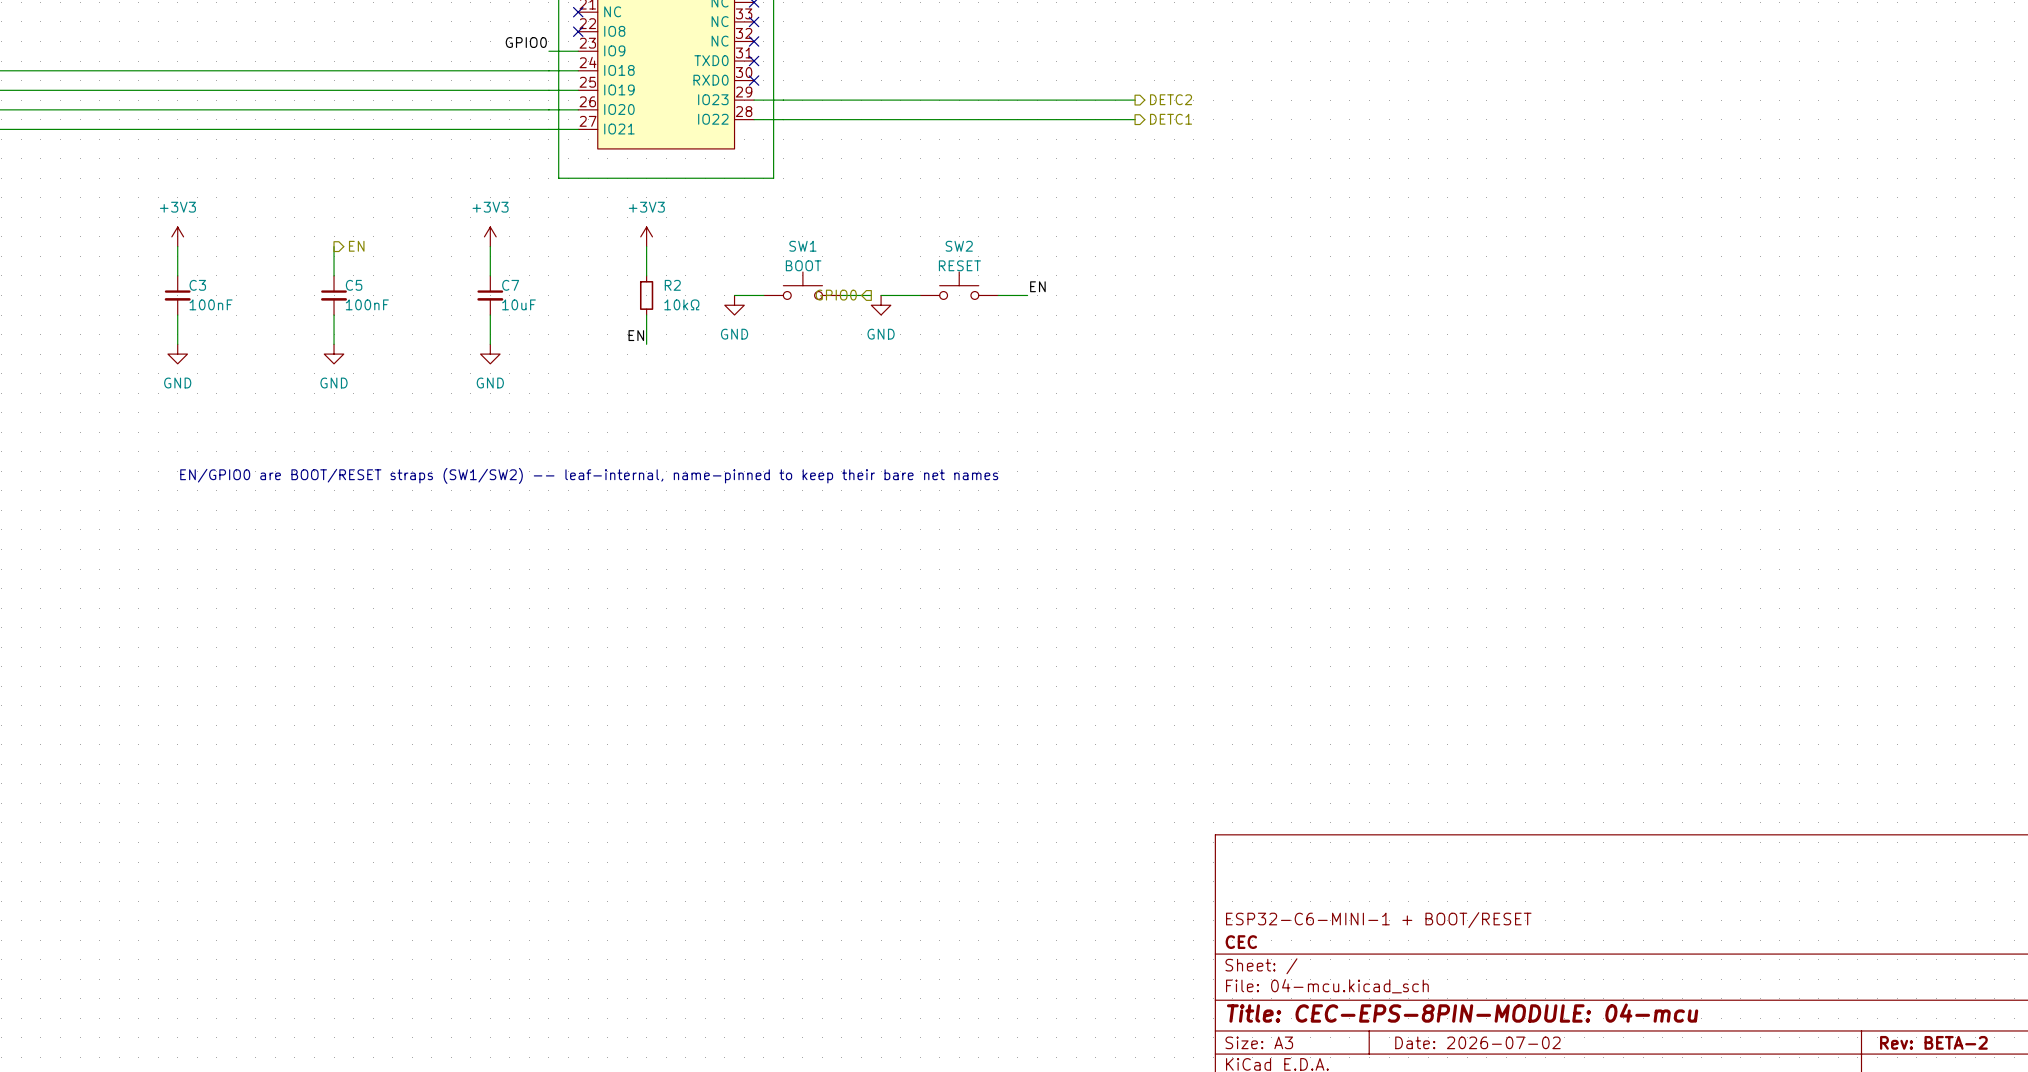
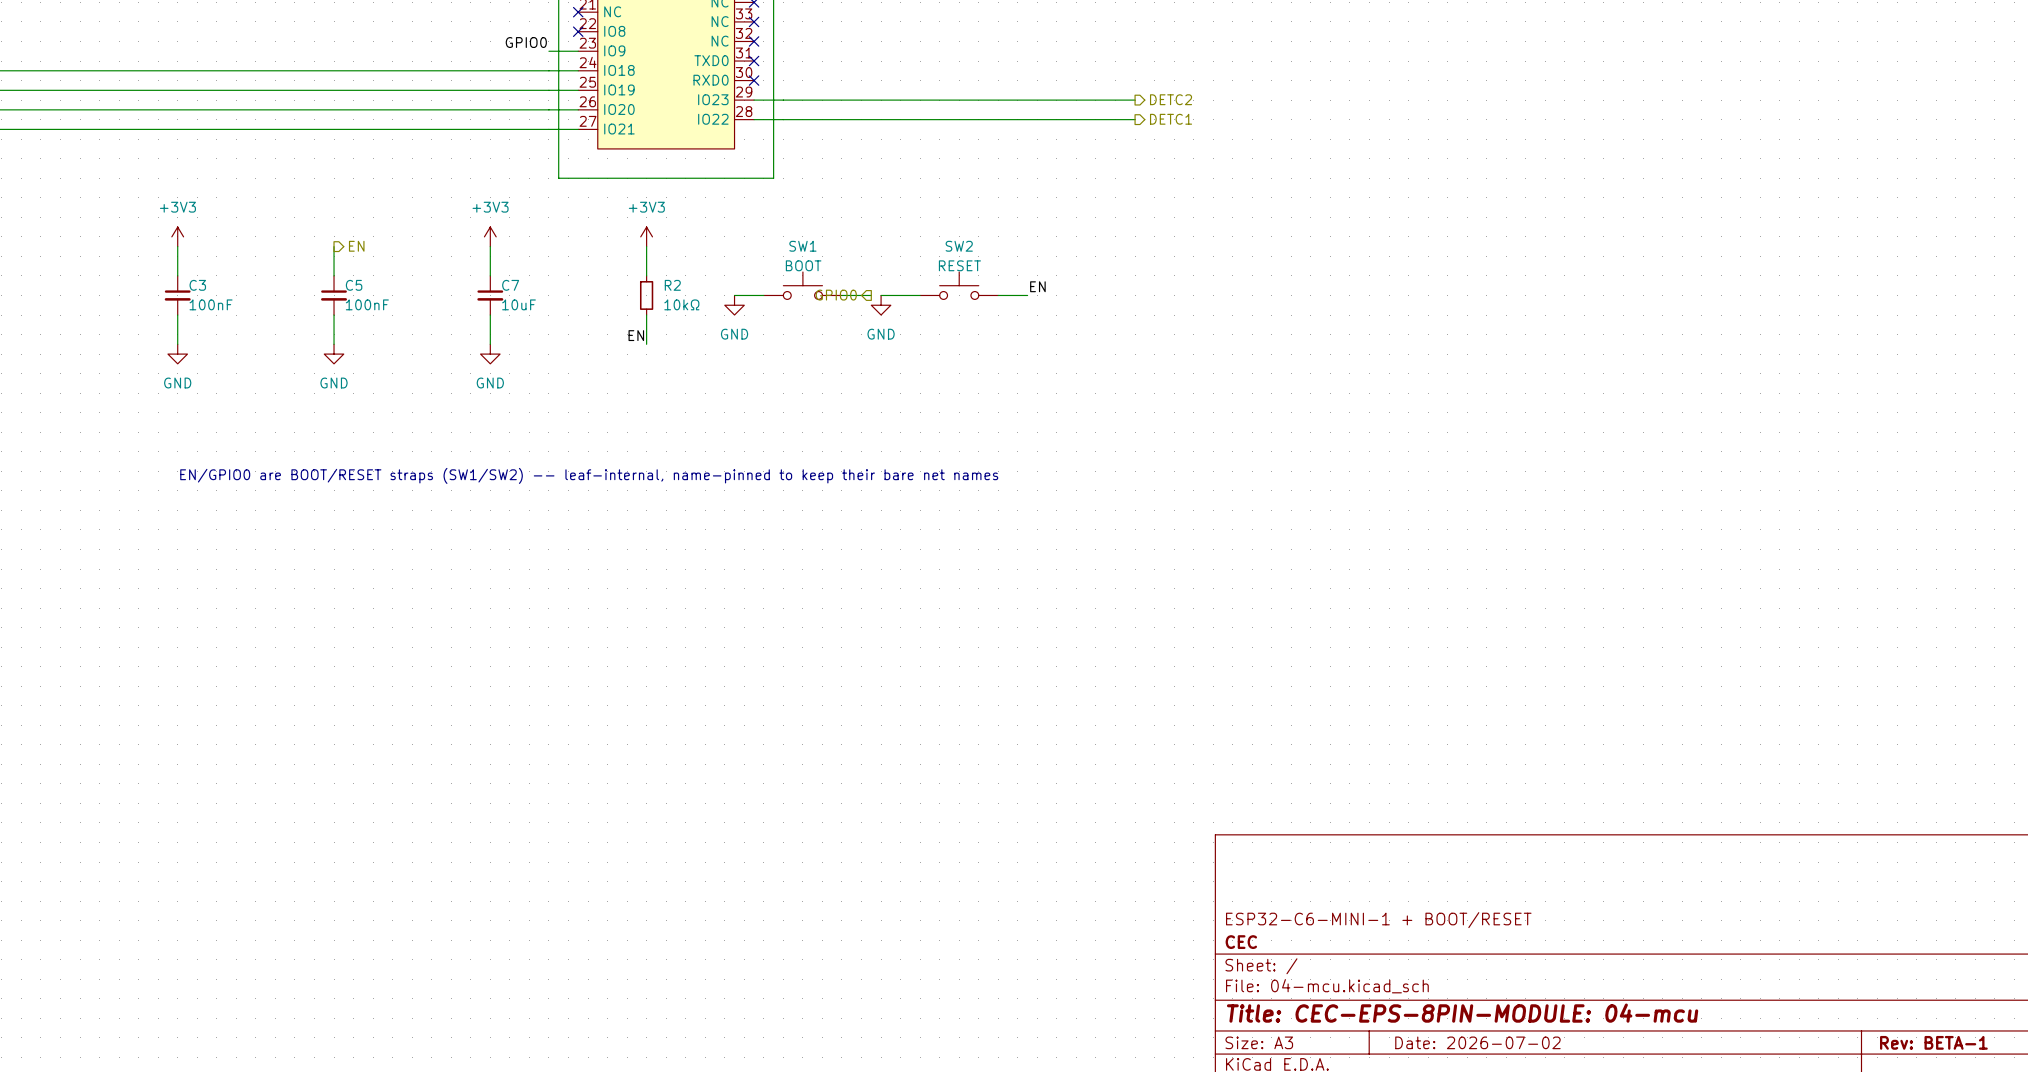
title block: Rev: BETA-2 (1933, 1042) -> Rev: BETA-1 (1933, 1042)

